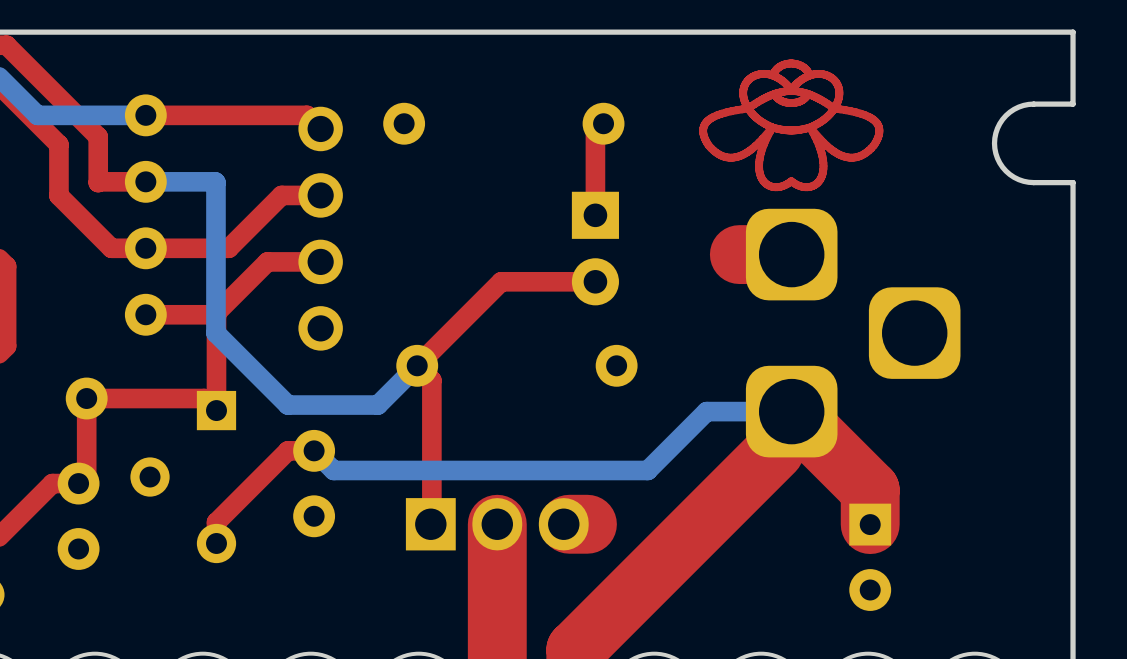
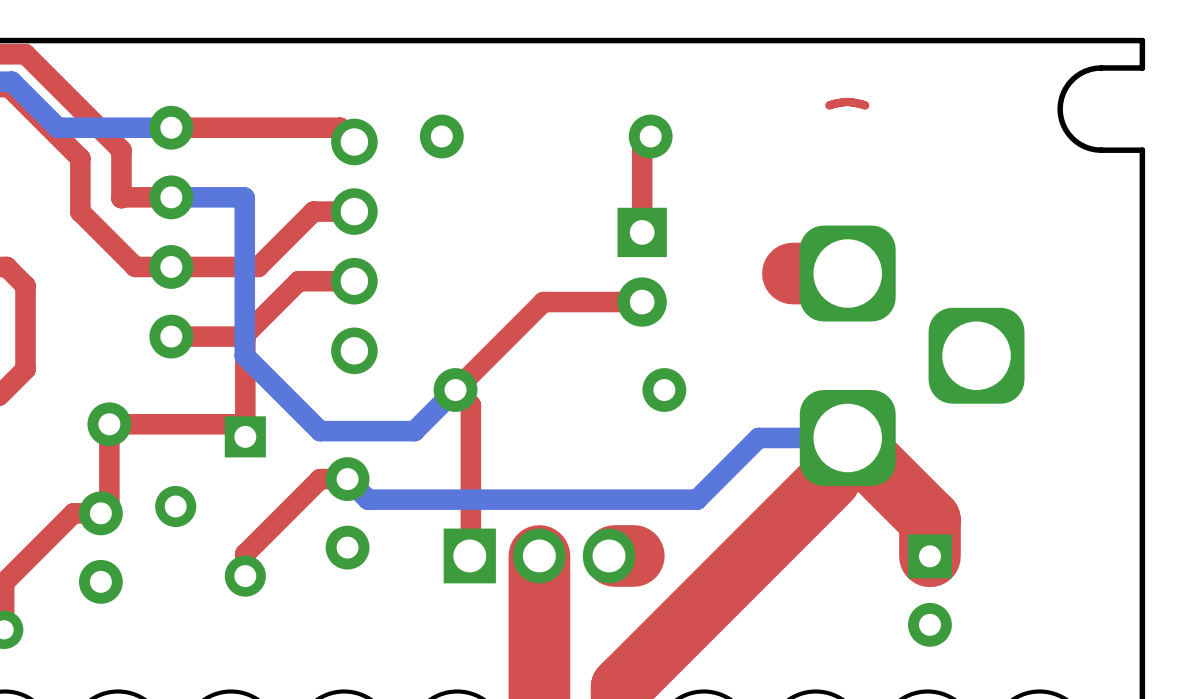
board edge: (1073, 58) (1073, 104) (1028, 104) (1014, 109) (999, 123) (994, 143) (999, 162) (1014, 177) (1028, 182) (1073, 182) -> (1142, 67) (1095, 68) (1080, 73) (1065, 88) (1060, 109) (1065, 129) (1080, 144) (1095, 149) (1142, 150) (1142, 198)
top track: (772, 75) (758, 74) (746, 81) (743, 94) (748, 108) -> none
top track: (809, 75) (803, 66) (791, 63) (779, 66) (772, 75) -> none
top track: (809, 75) (798, 82) (791, 90) (783, 82) (772, 75) -> none
top track: (809, 75) (823, 74) (835, 81) (839, 94) (834, 108) -> none
top track: (748, 108) (757, 119) (772, 127) -> none
top track: (748, 108) (721, 113) (711, 117) (705, 123) (703, 129) (704, 136) (708, 145) (716, 152) (728, 157) (743, 154) (755, 145) (772, 127) -> none
top track: (834, 108) (861, 113) (870, 117) (877, 123) (879, 129) (878, 136) (873, 145) (866, 152) (853, 157) (839, 154) (826, 145) (810, 127) -> none
top track: (834, 108) (824, 119) (810, 127) -> none
top track: (834, 108) (808, 94) (800, 100) (791, 103) (781, 100) (774, 94) (748, 108) -> none
top track: (810, 127) (820, 149) (823, 168) (818, 181) (807, 187) (799, 185) (791, 181) (783, 185) (773, 187) (762, 179) (759, 168) (760, 156) (772, 127) -> none
top track: (810, 127) (791, 130) (772, 127) -> none

